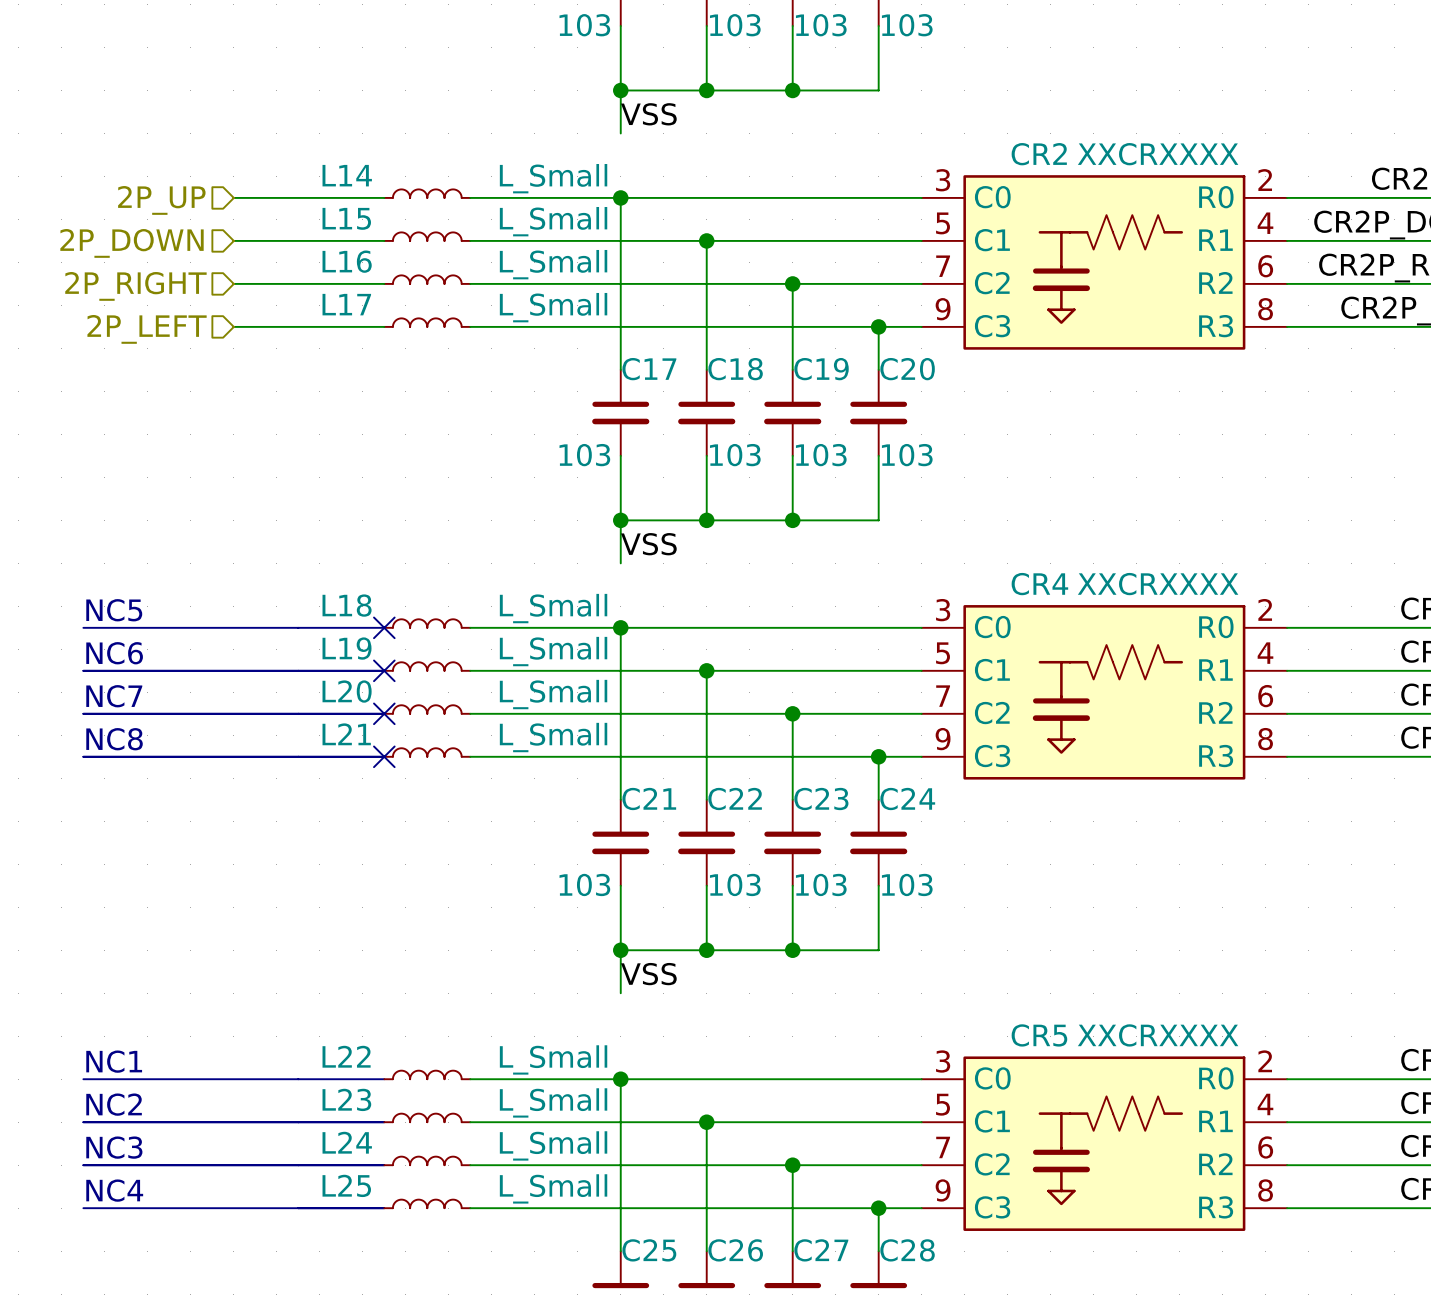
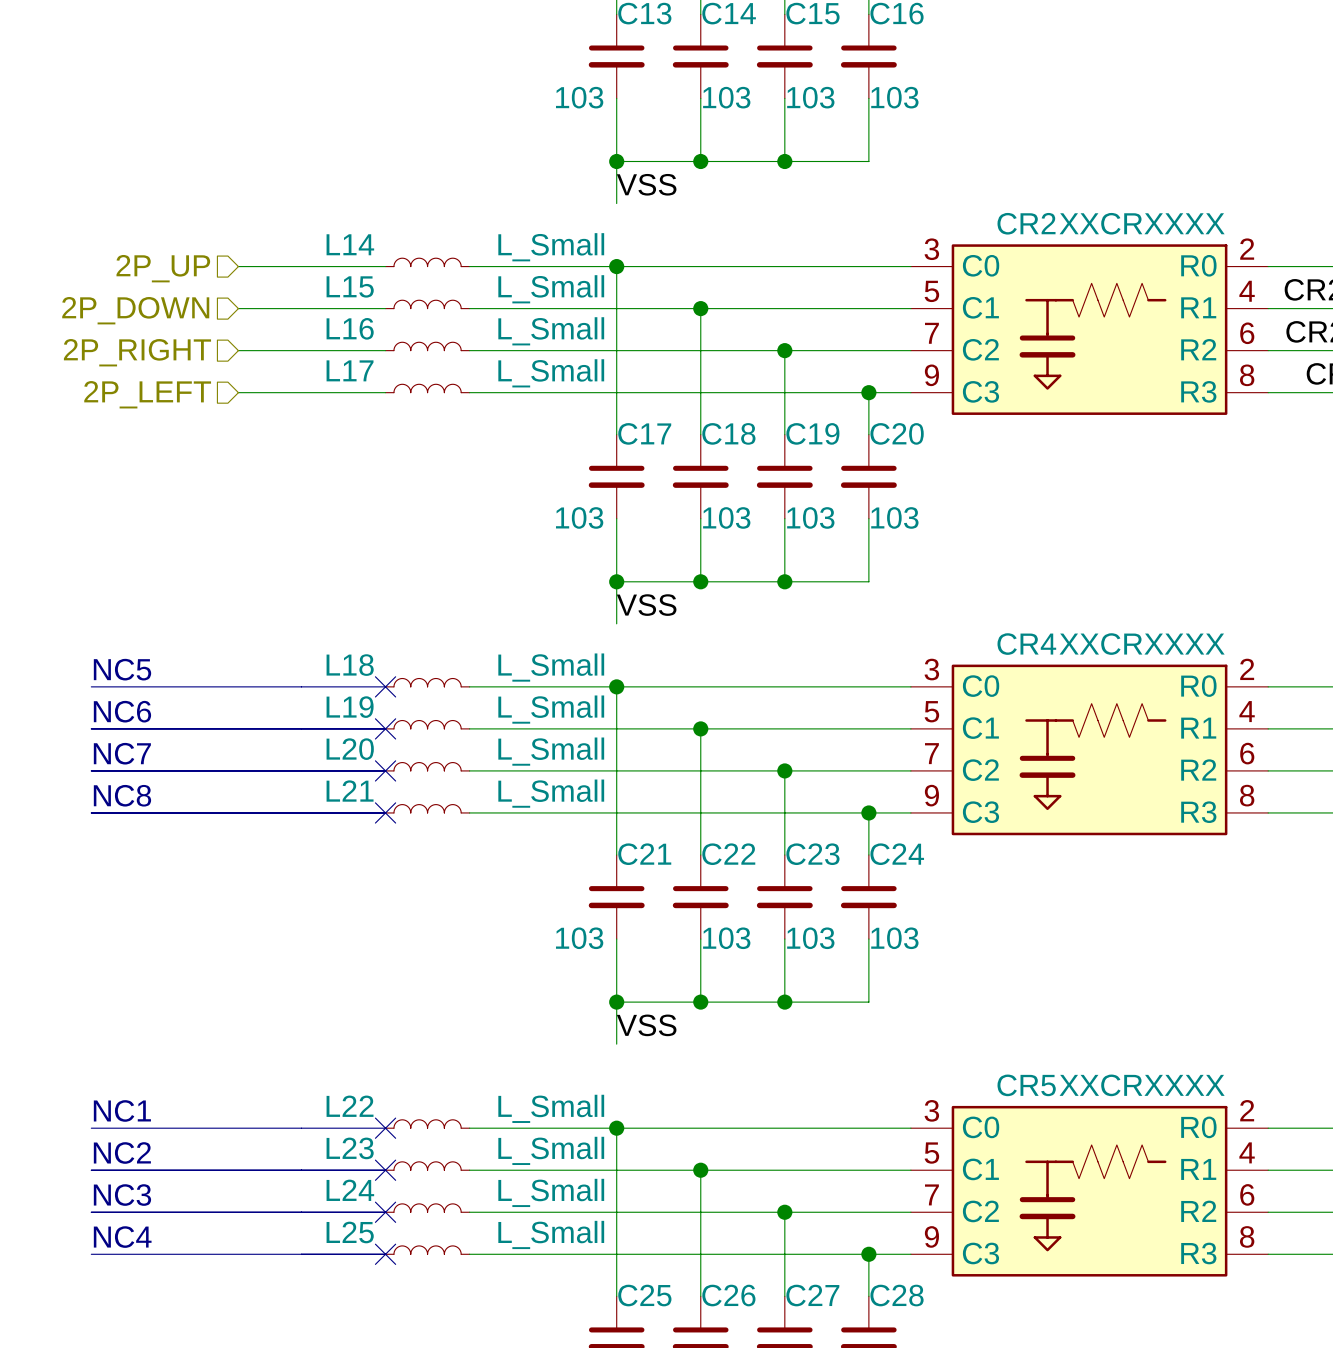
no-connect mark: none -> (385, 1128)
no-connect mark: none -> (385, 1170)
no-connect mark: none -> (385, 1212)
no-connect mark: none -> (385, 1254)

